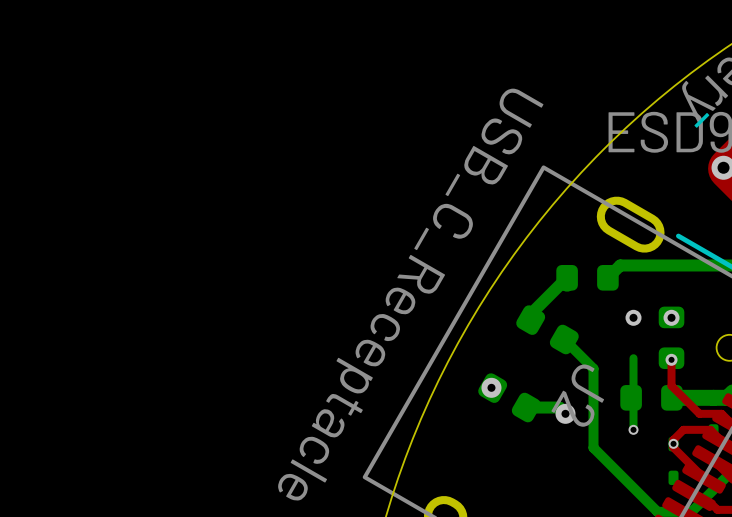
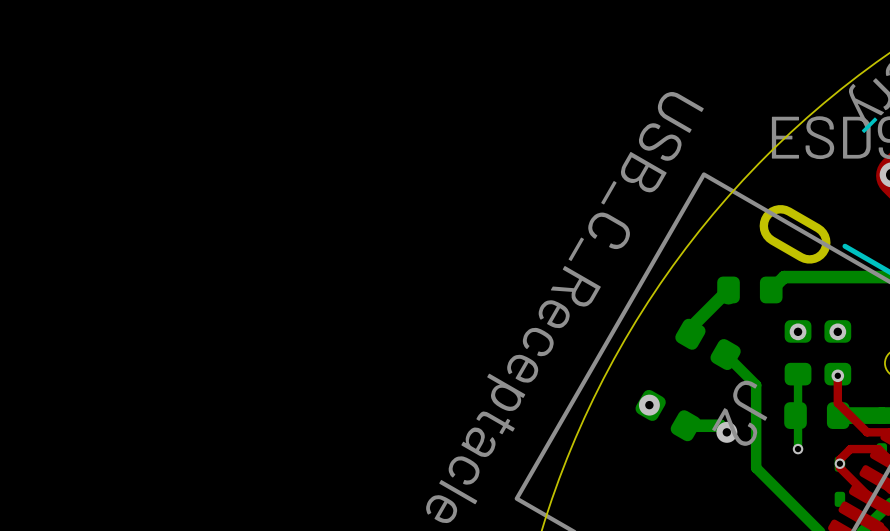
part: none -> (798, 352)

